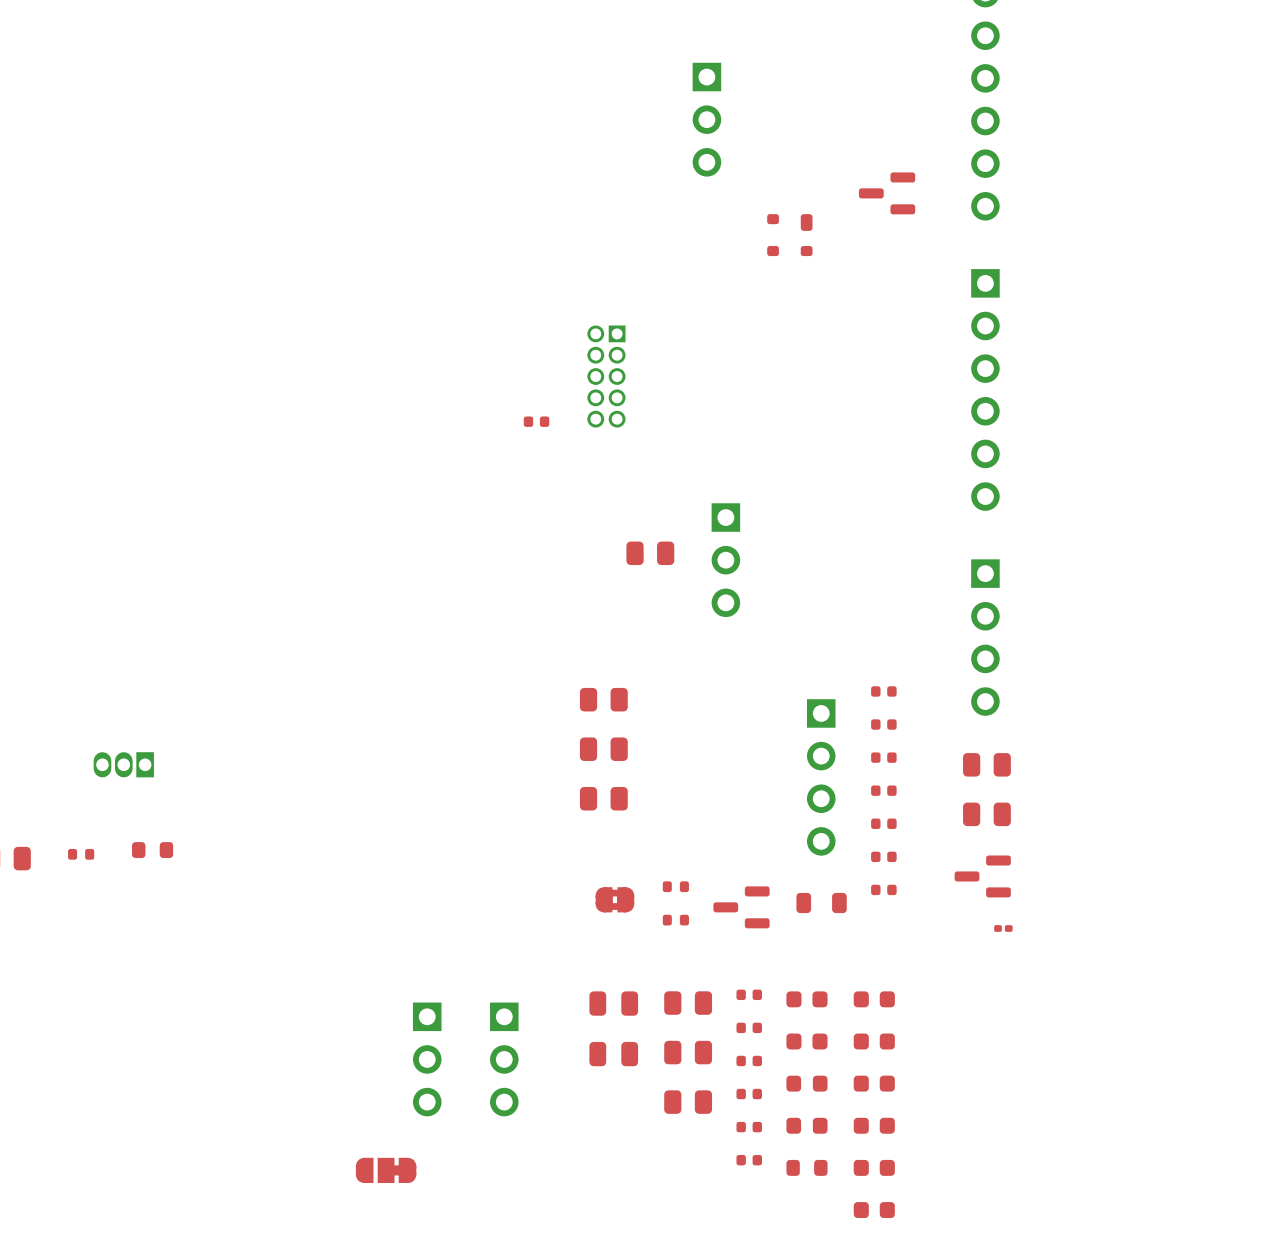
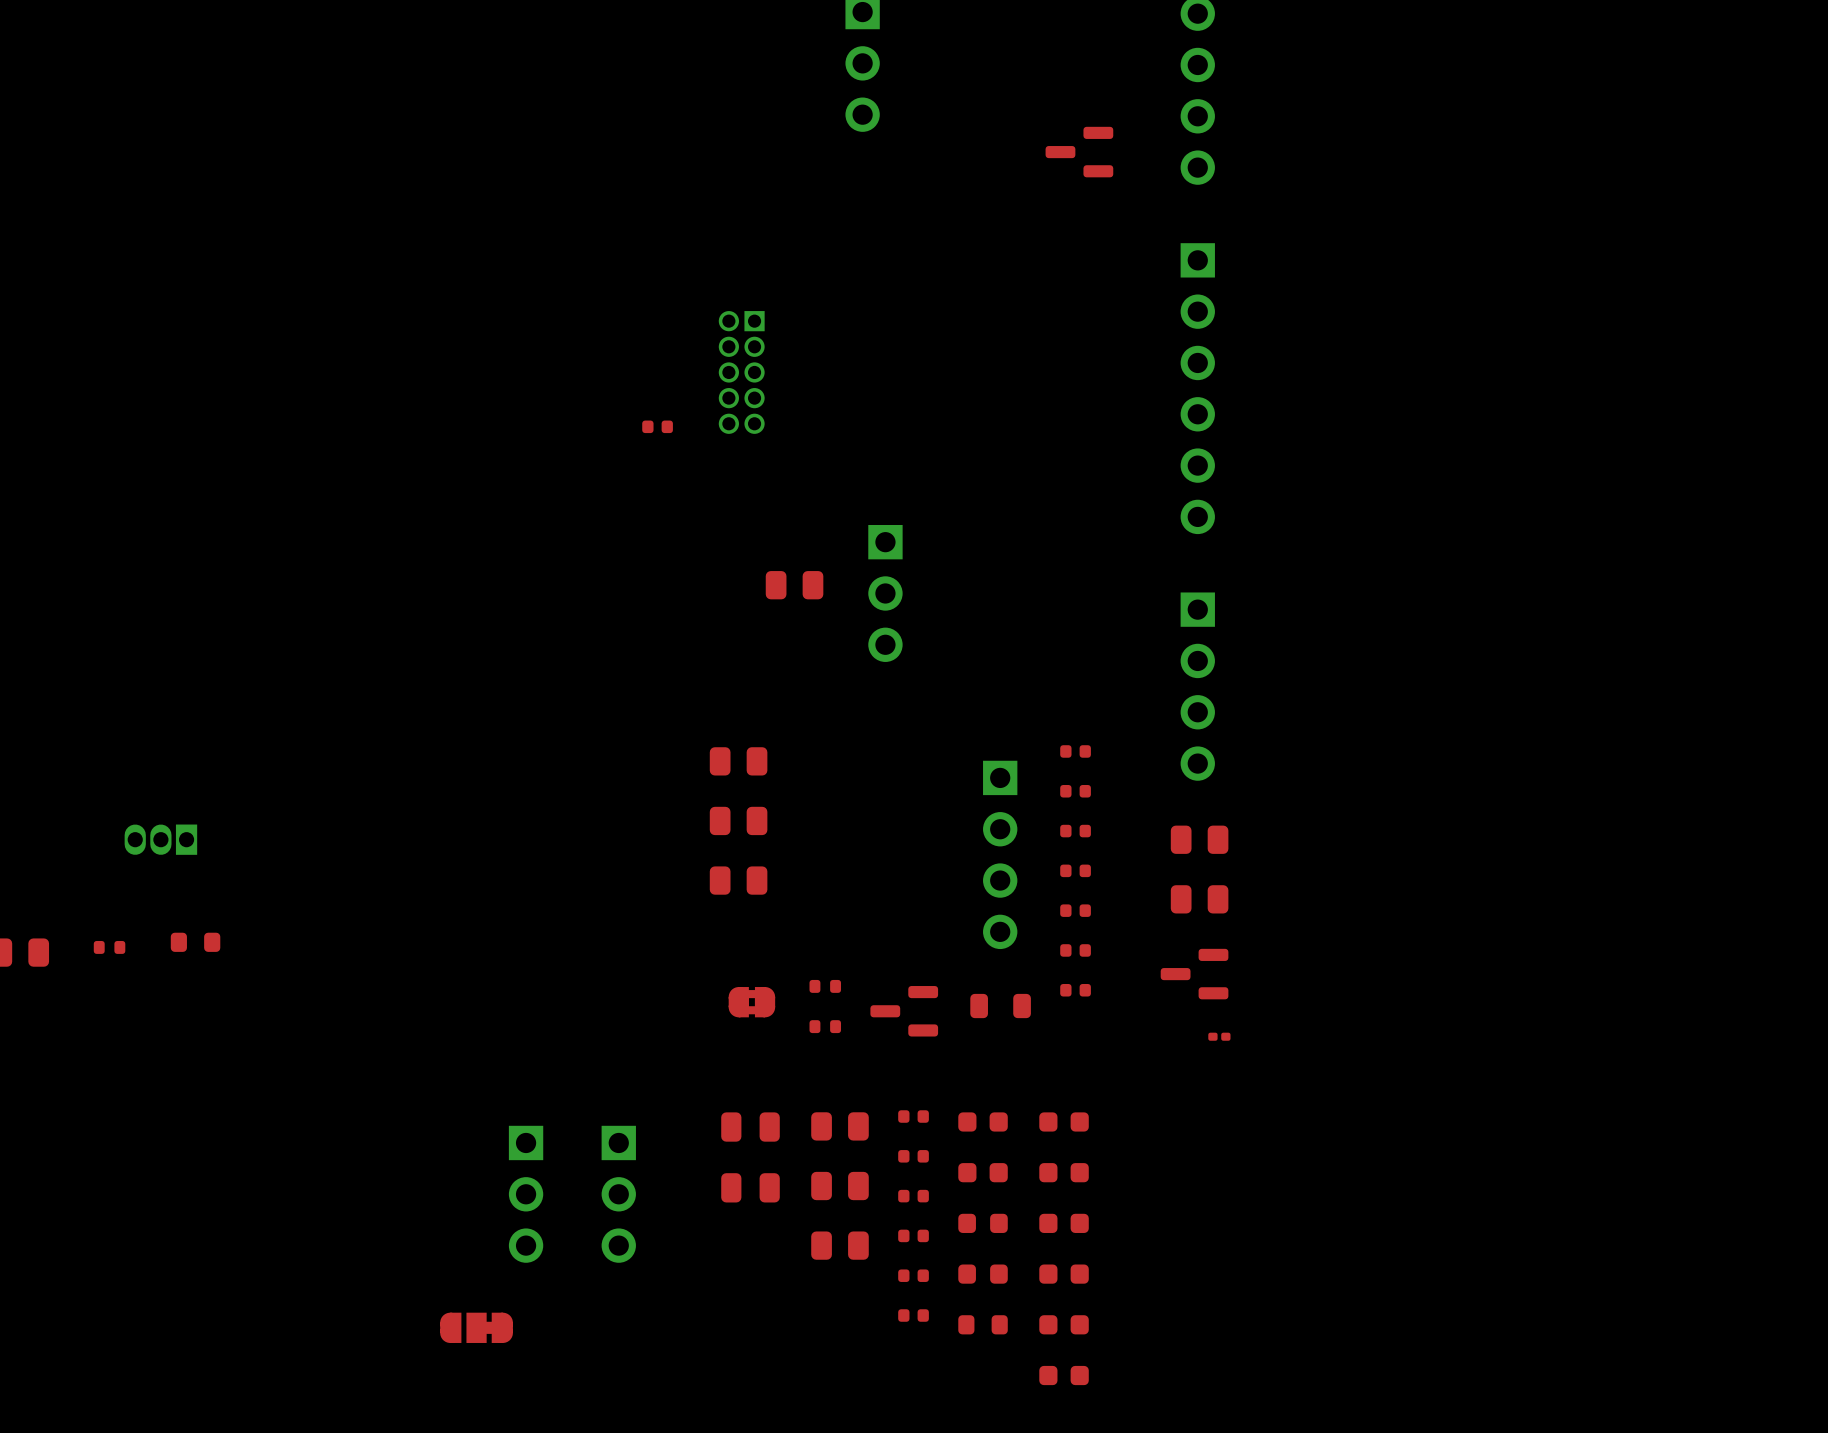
part: (789, 235) -> none

